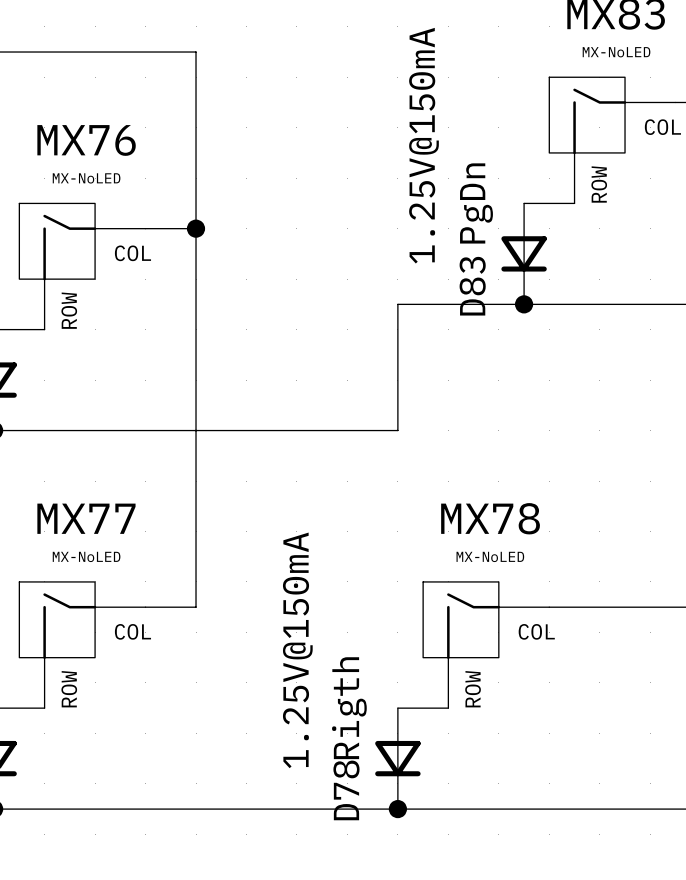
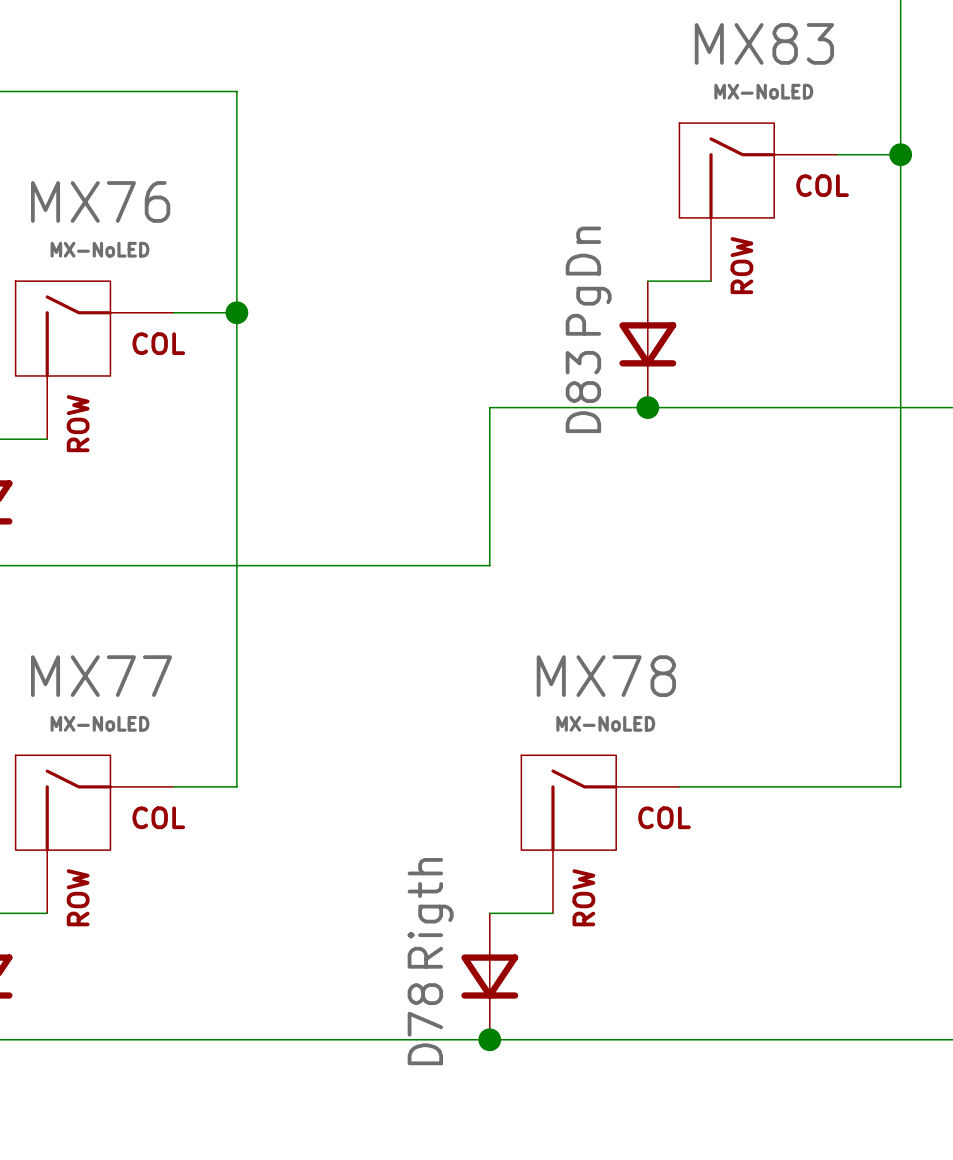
D83 value: 1.25V@150mA (423, 145) -> none
D78 value: 1.25V@150mA (297, 650) -> none

